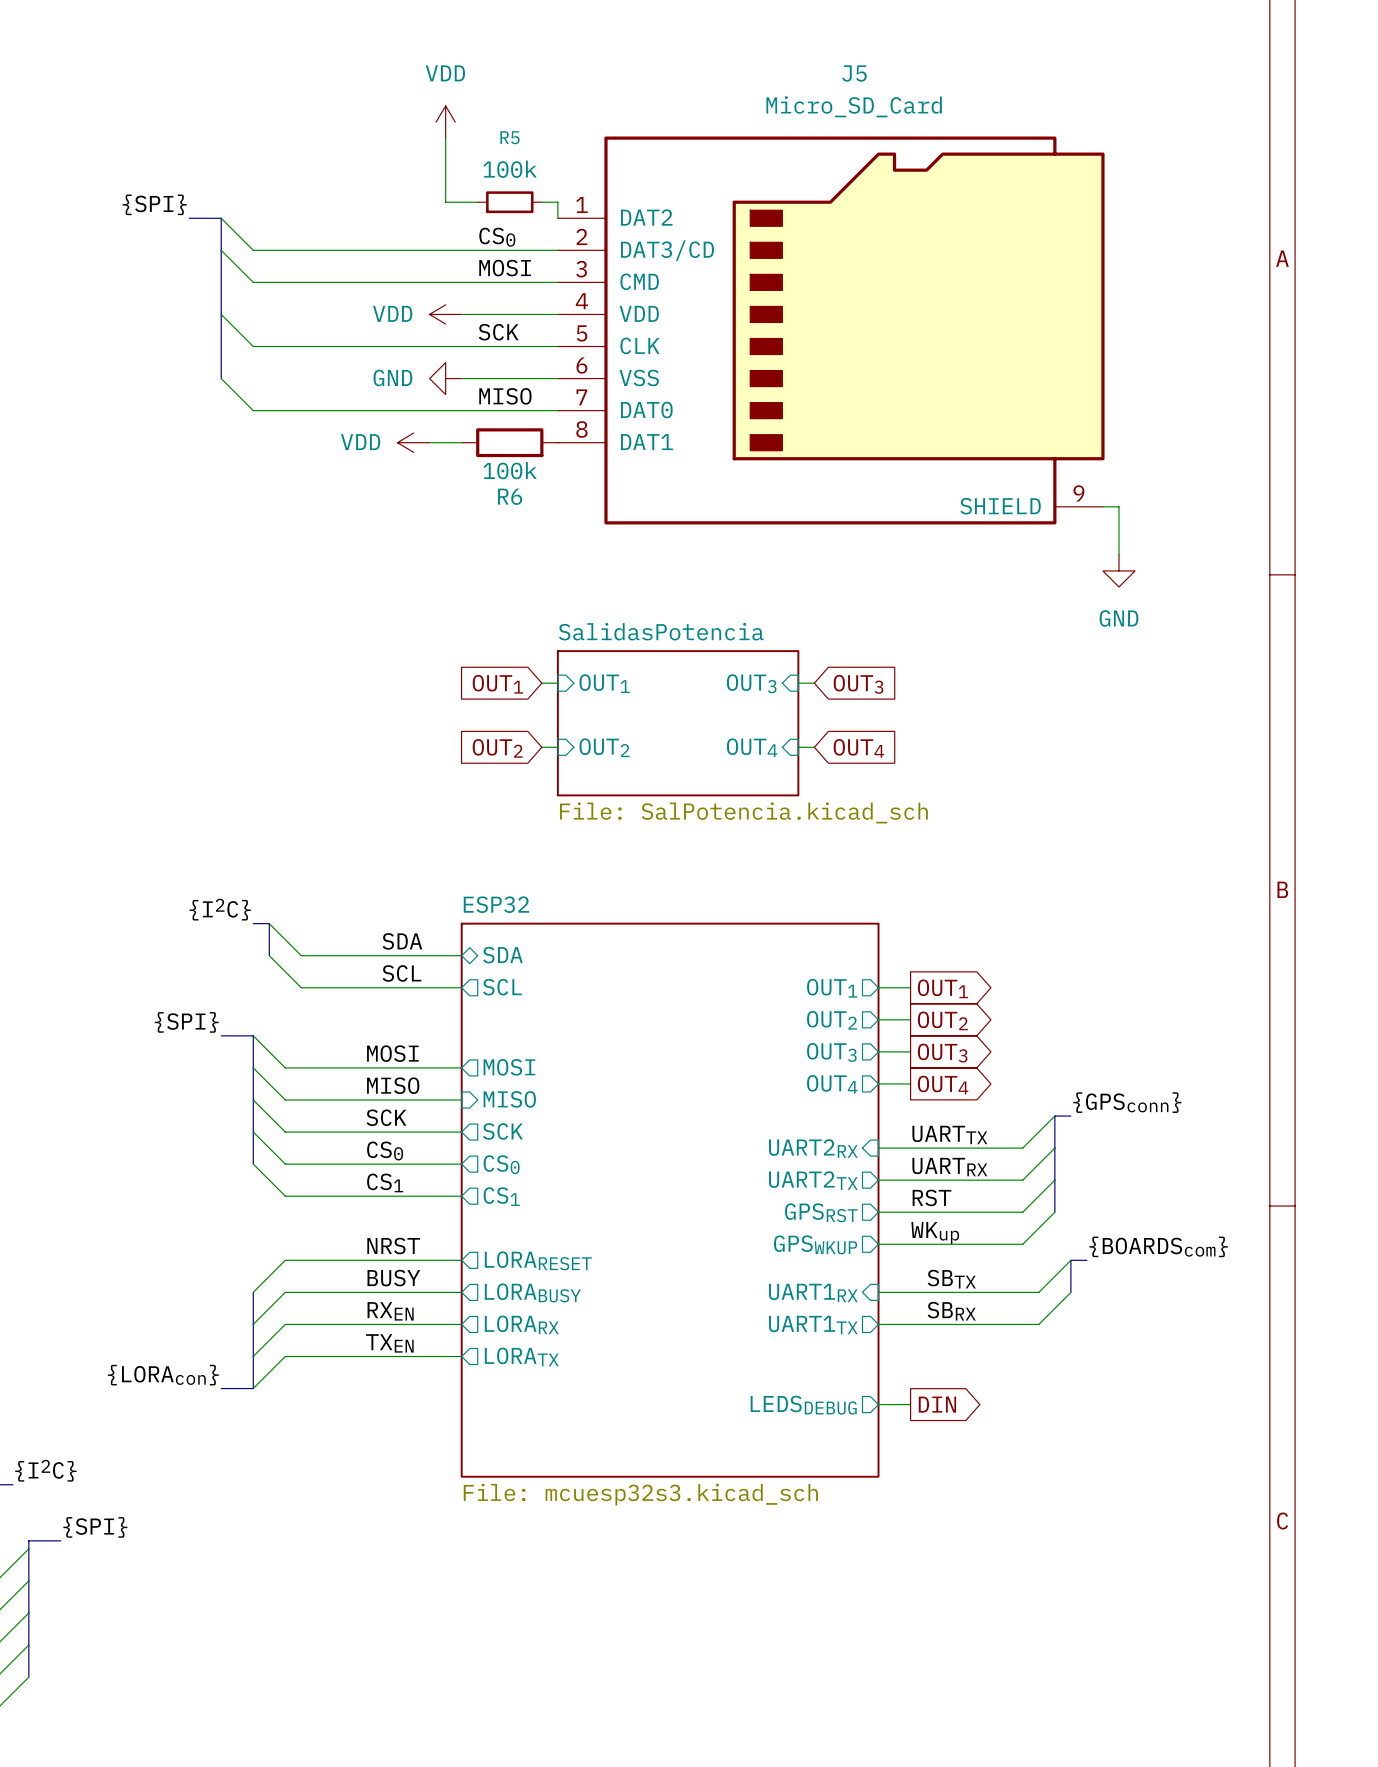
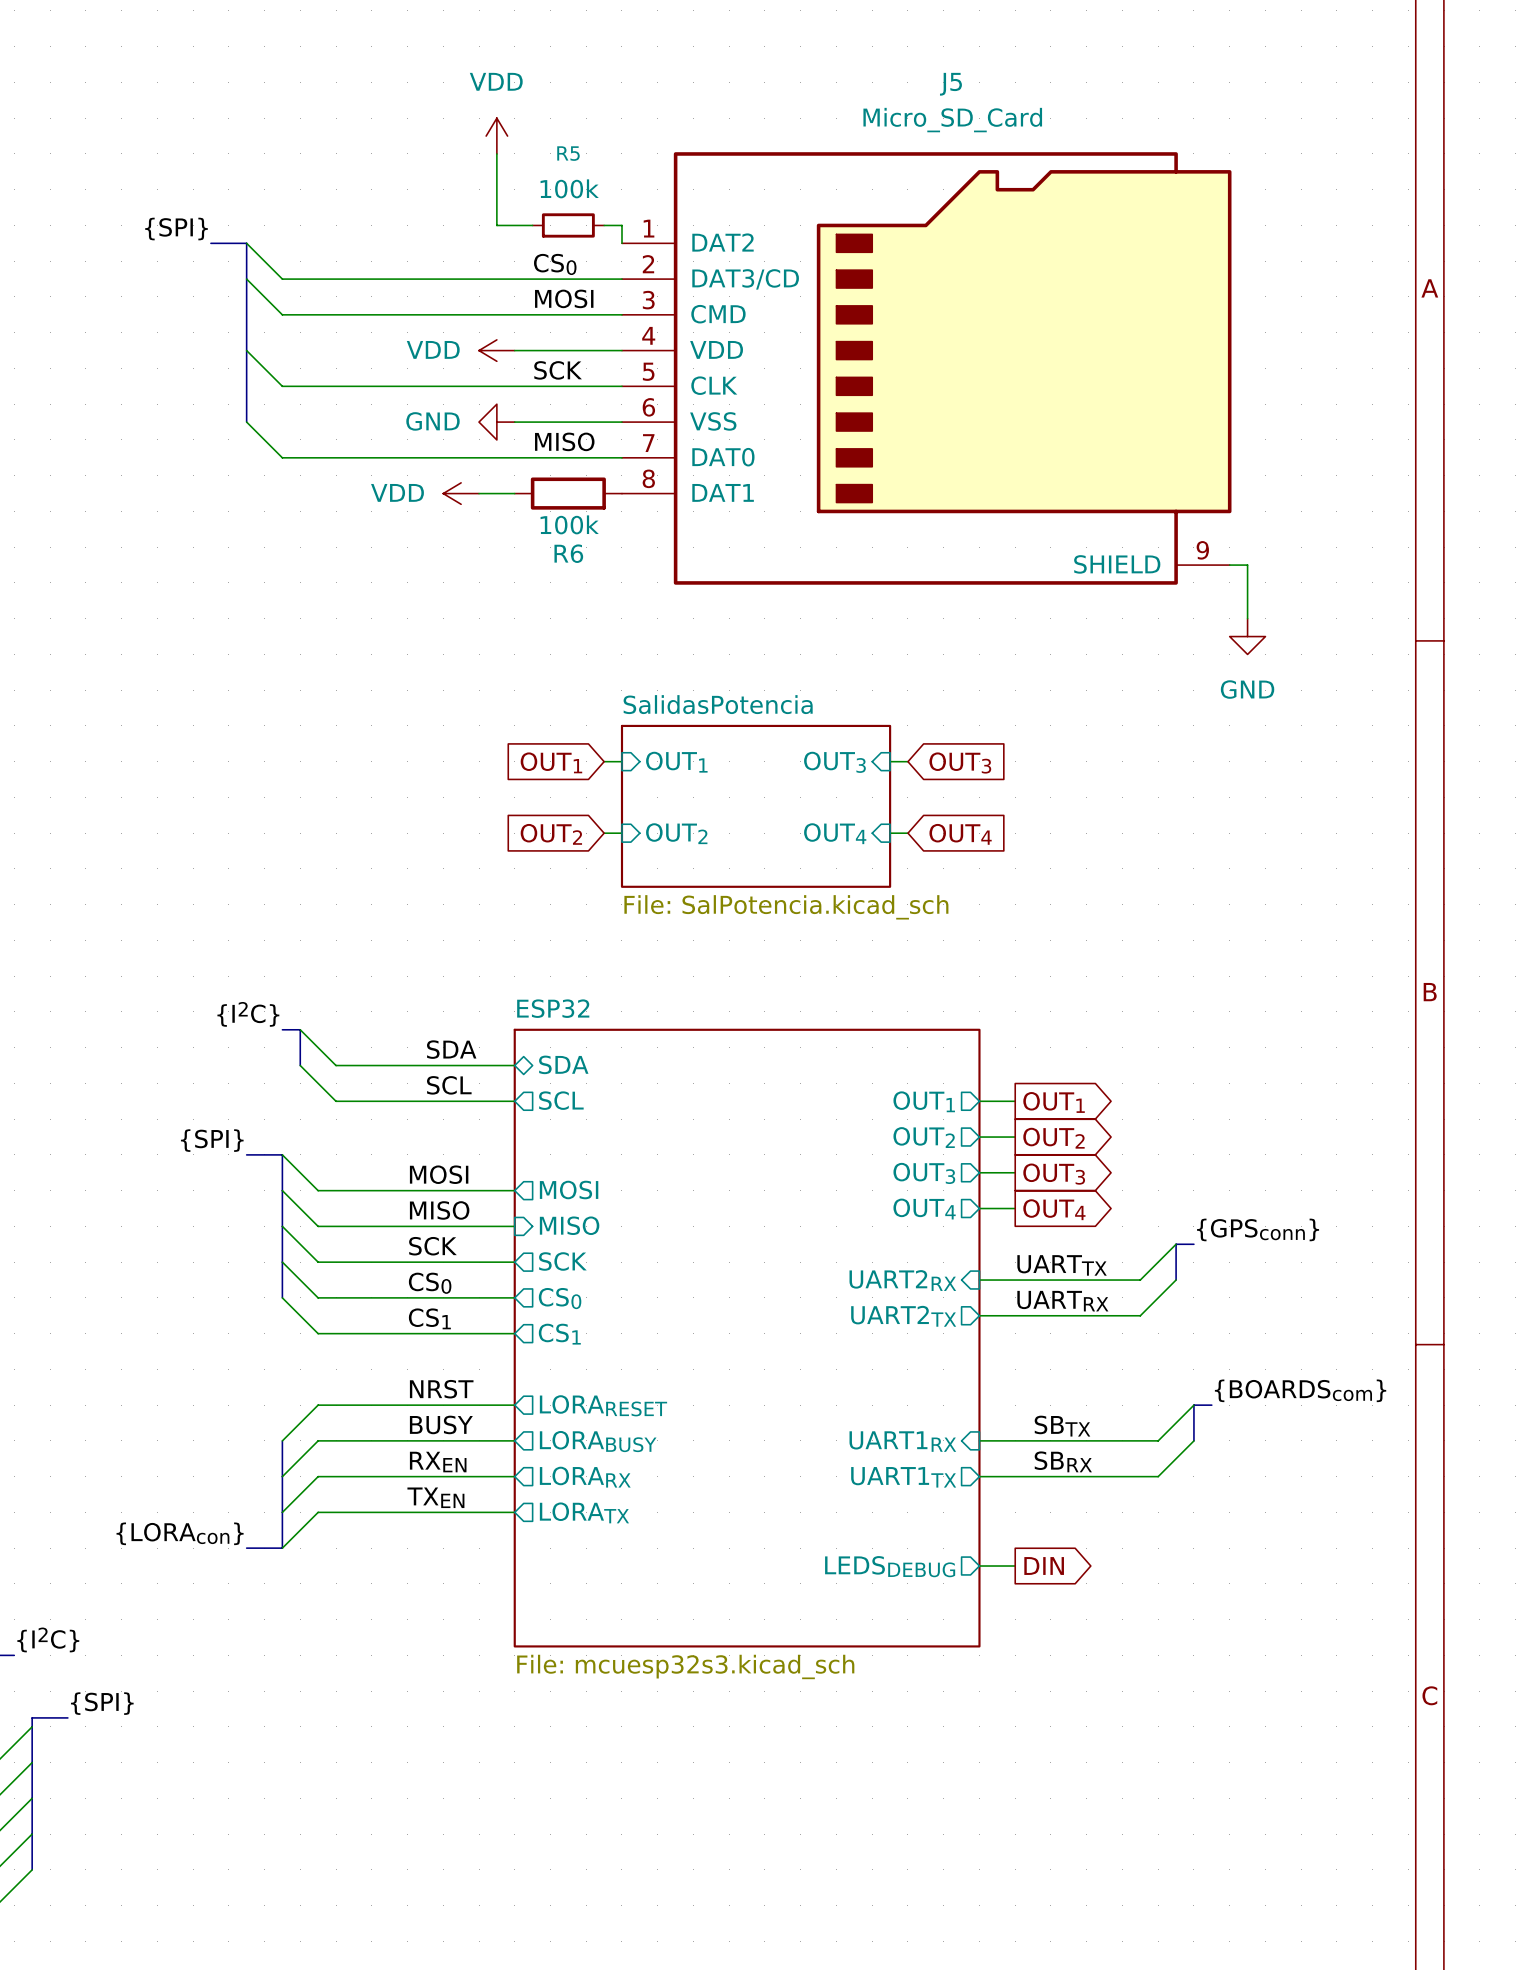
bus: (1054, 1148) (1054, 1212) -> none
wire: (1054, 1180) (1022, 1212) (878, 1212) -> none
label: RST (932, 1197) -> none
sheet pin: GPSRST (821, 1212) -> none
wire: (1054, 1212) (1022, 1244) (878, 1244) -> none
label: WKup (935, 1233) -> none
sheet pin: GPSWKUP (815, 1244) -> none

